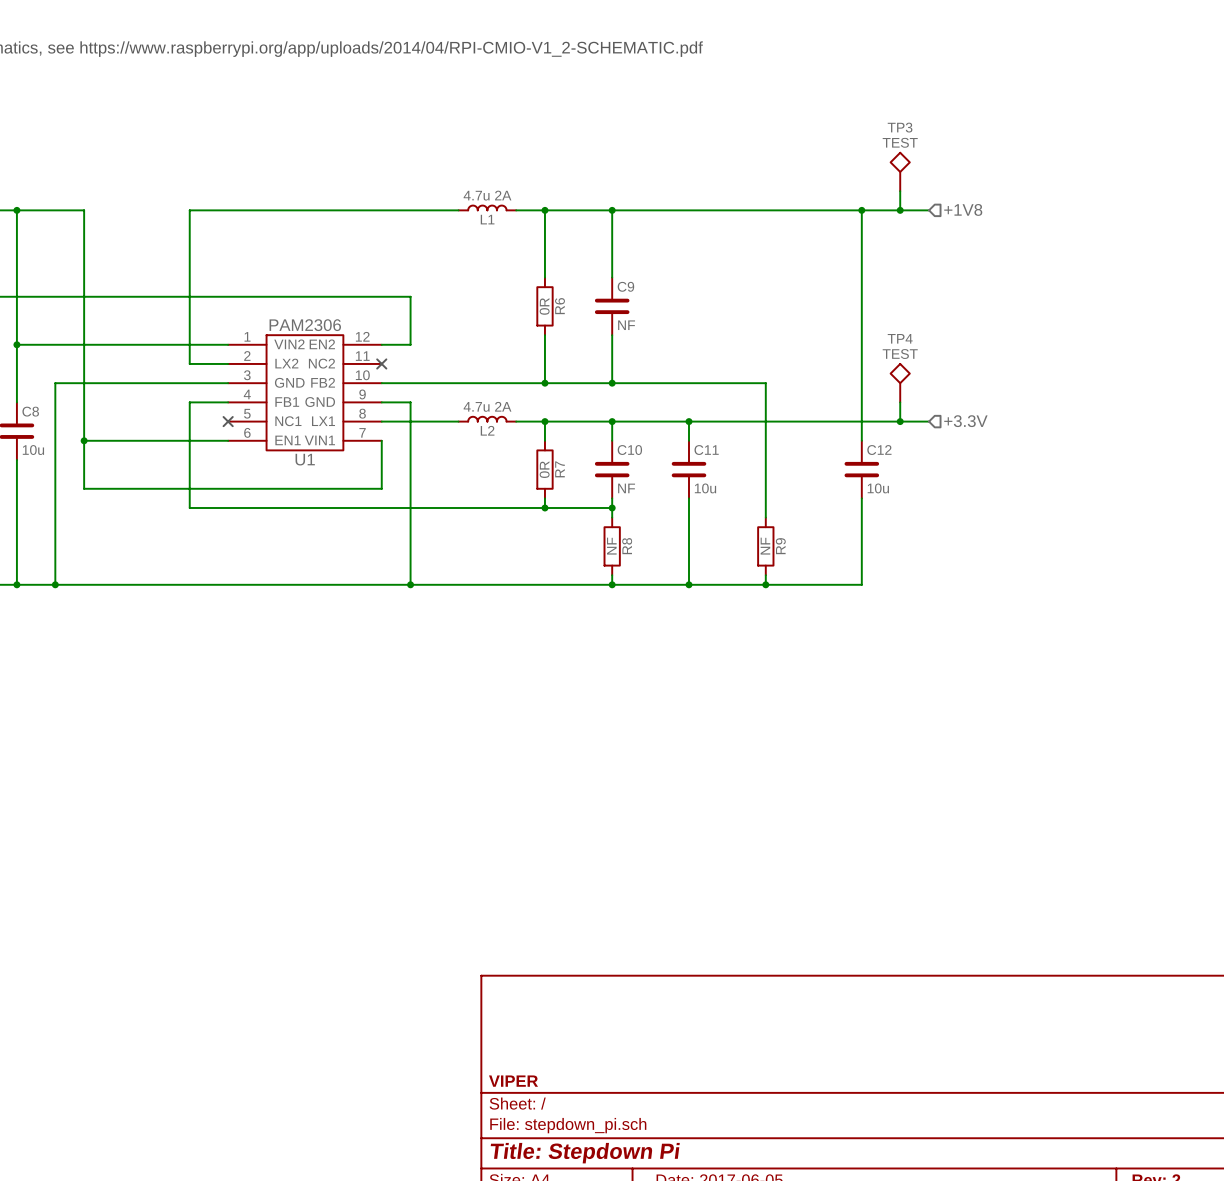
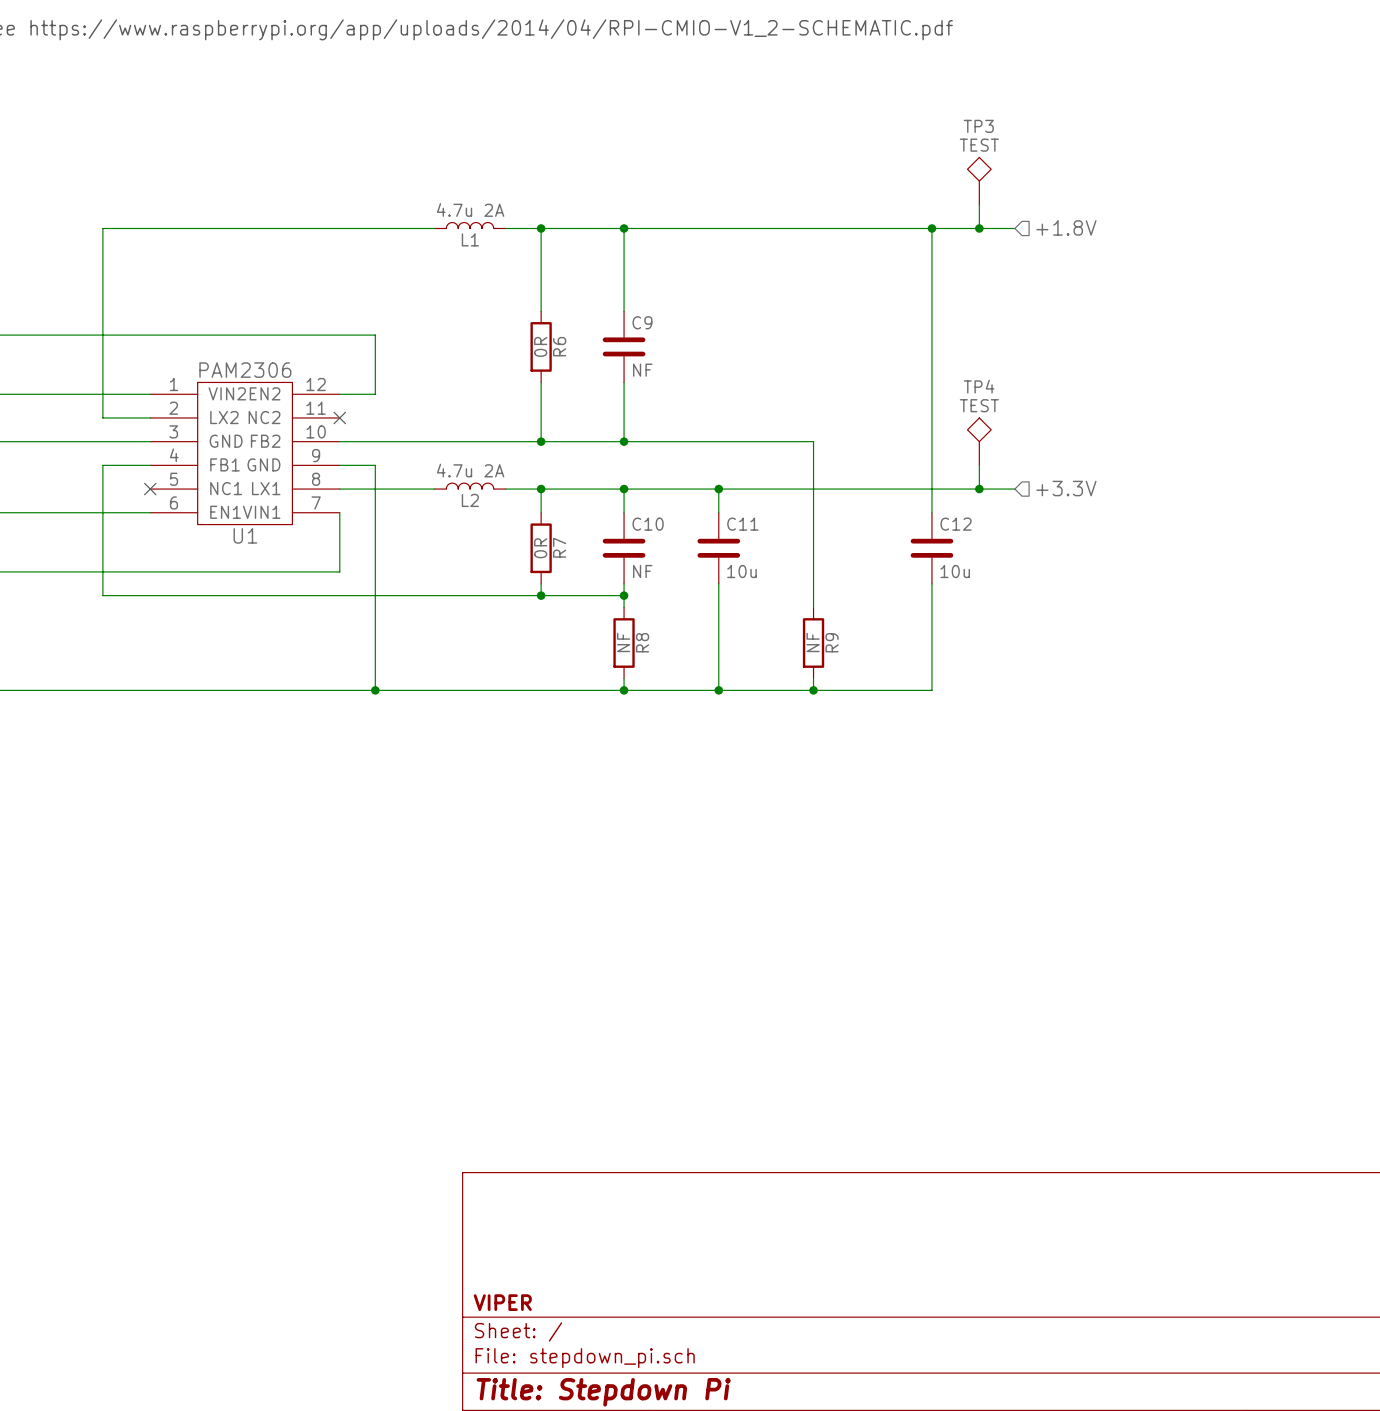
hierarchical label: +1V8 (963, 209) -> +1.8V (1066, 227)

